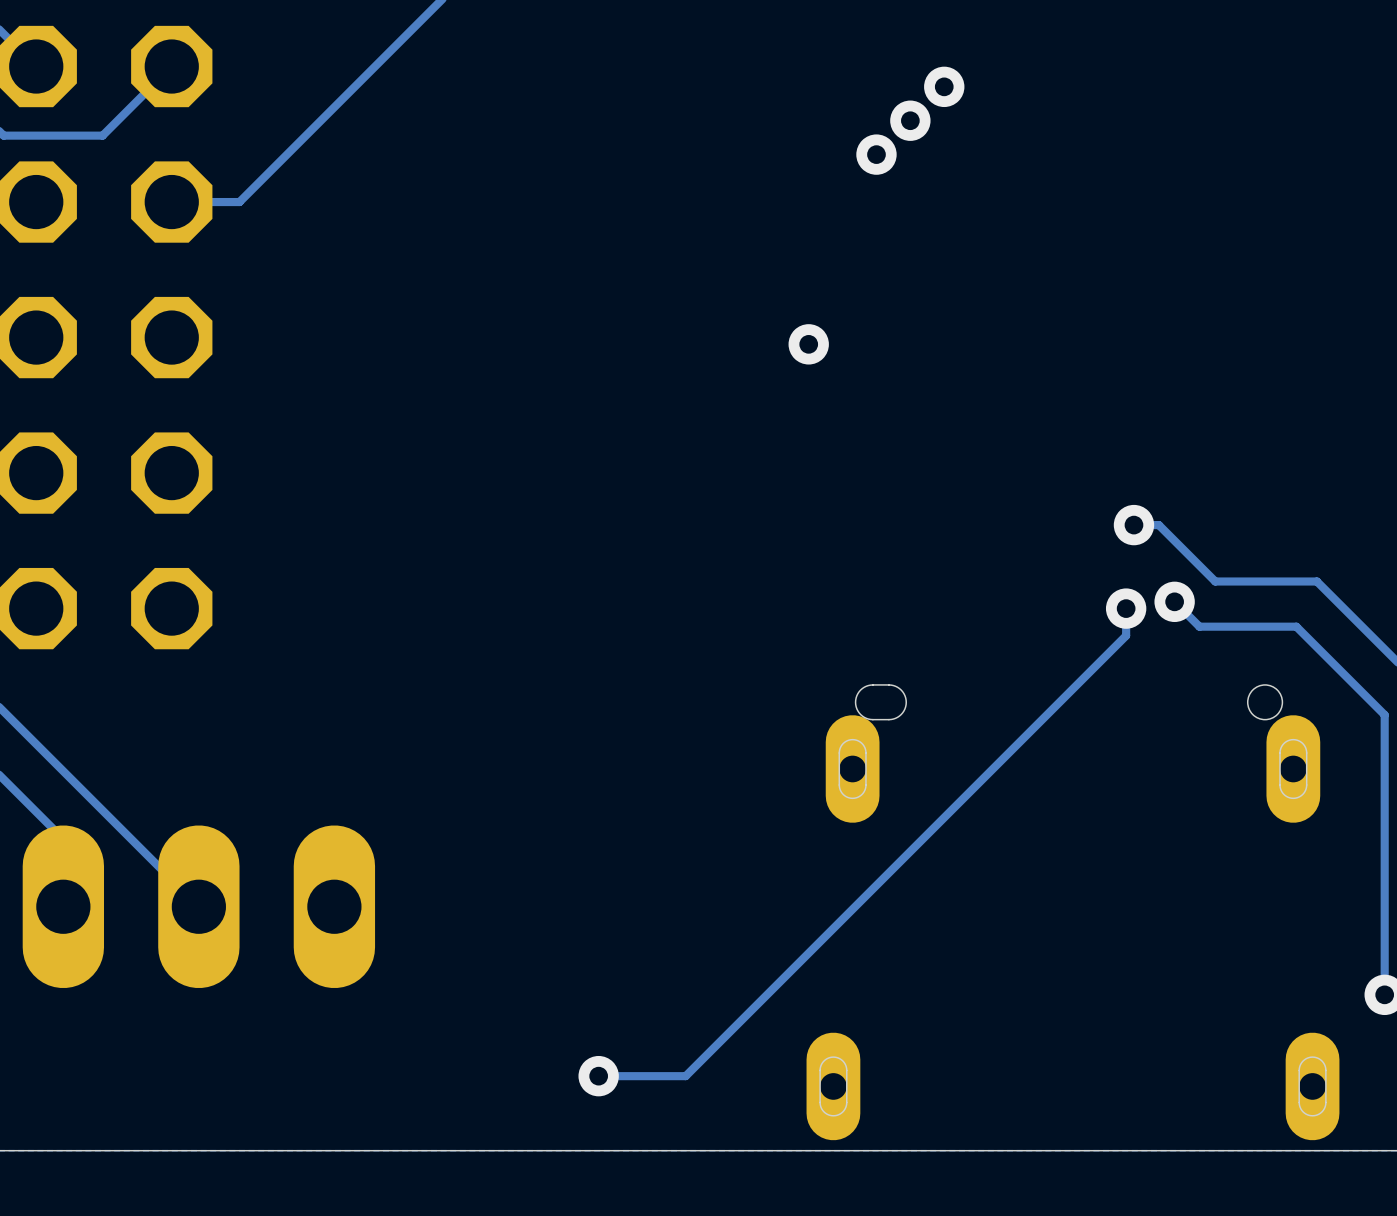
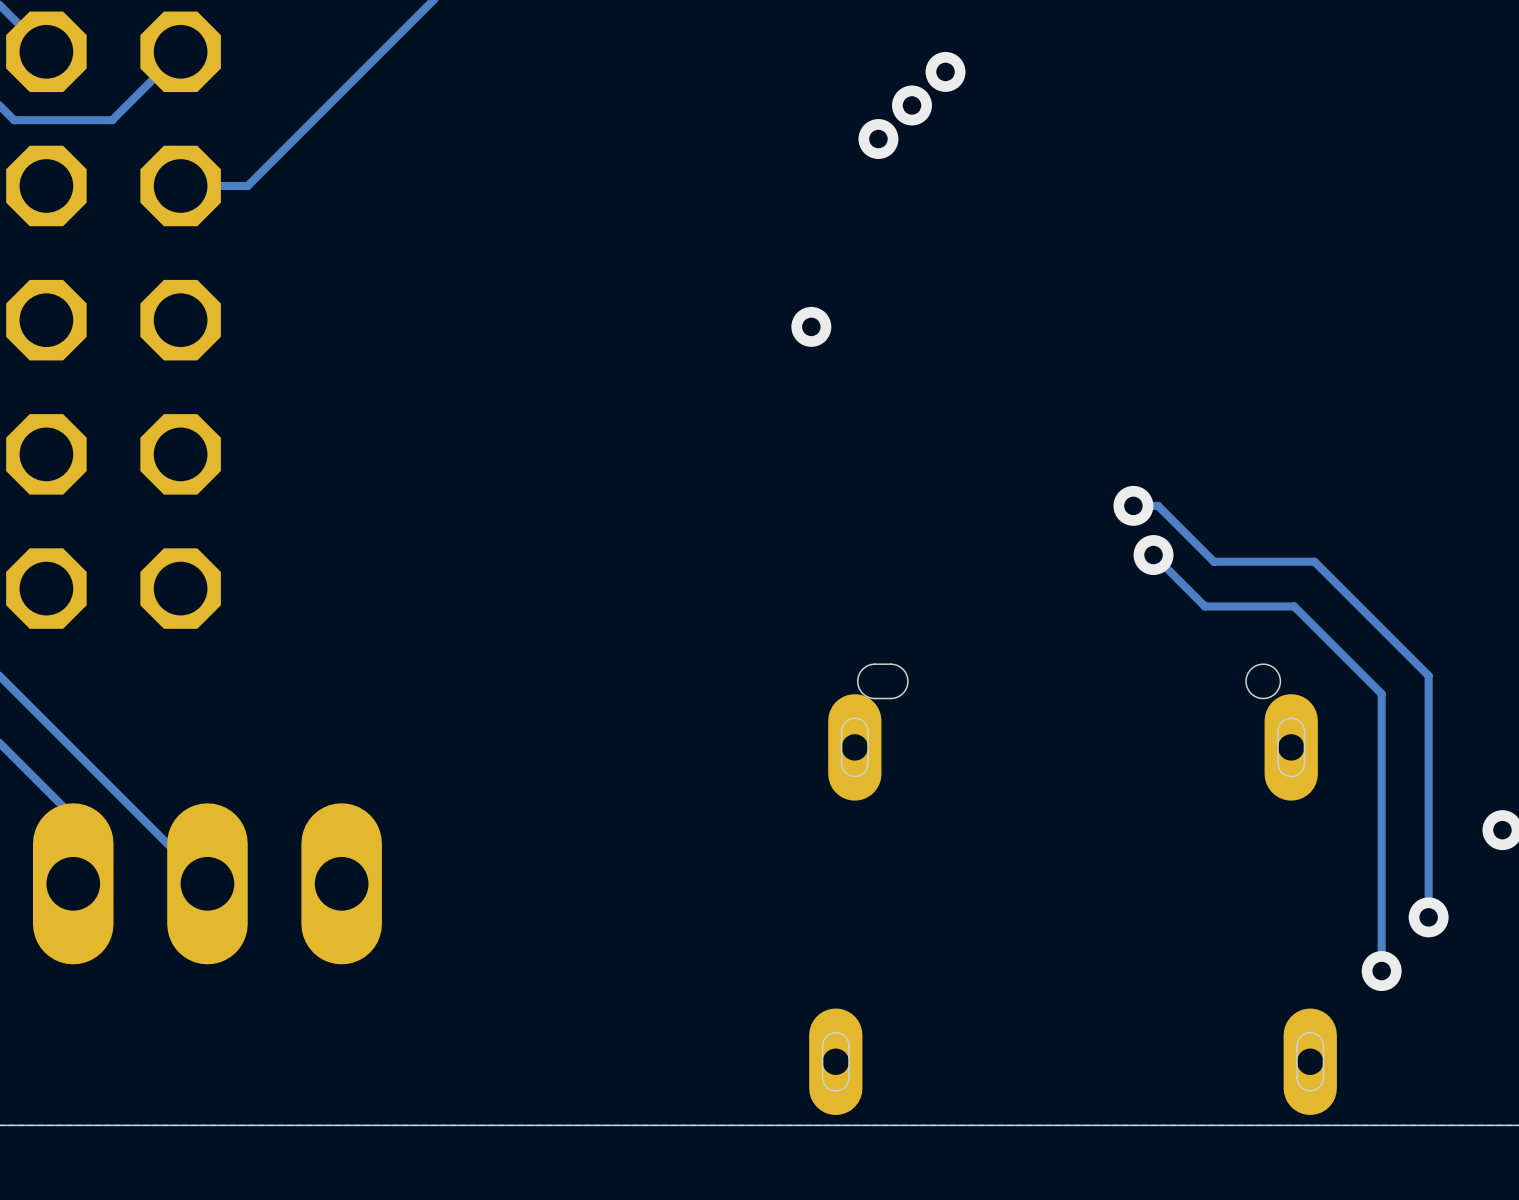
via: none -> (1153, 555)
track: (1174, 601) (1199, 626) (1206, 626) -> (1153, 555) (1204, 606)
via: (1174, 601) -> none
track: (1126, 608) (1126, 635) (685, 1076) (598, 1076) -> none
via: (1126, 608) -> none
via: (598, 1076) -> none

